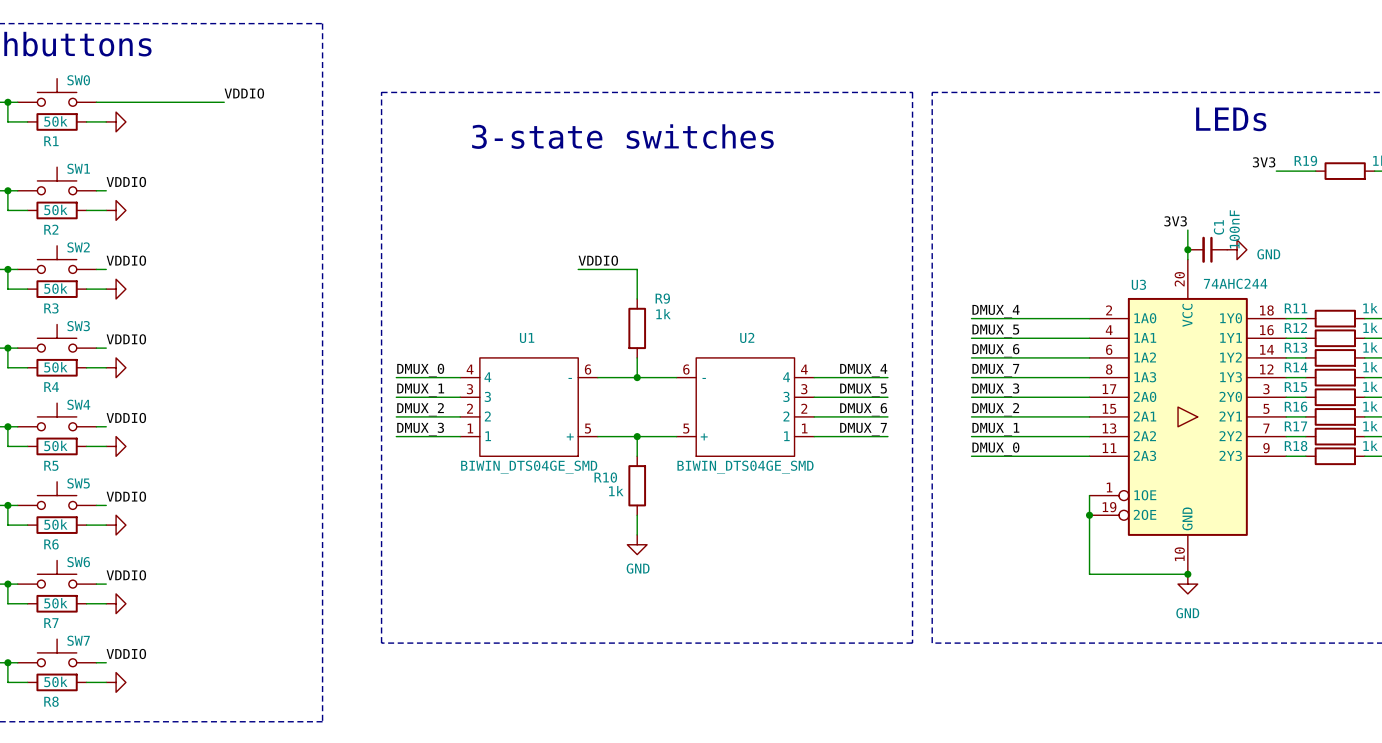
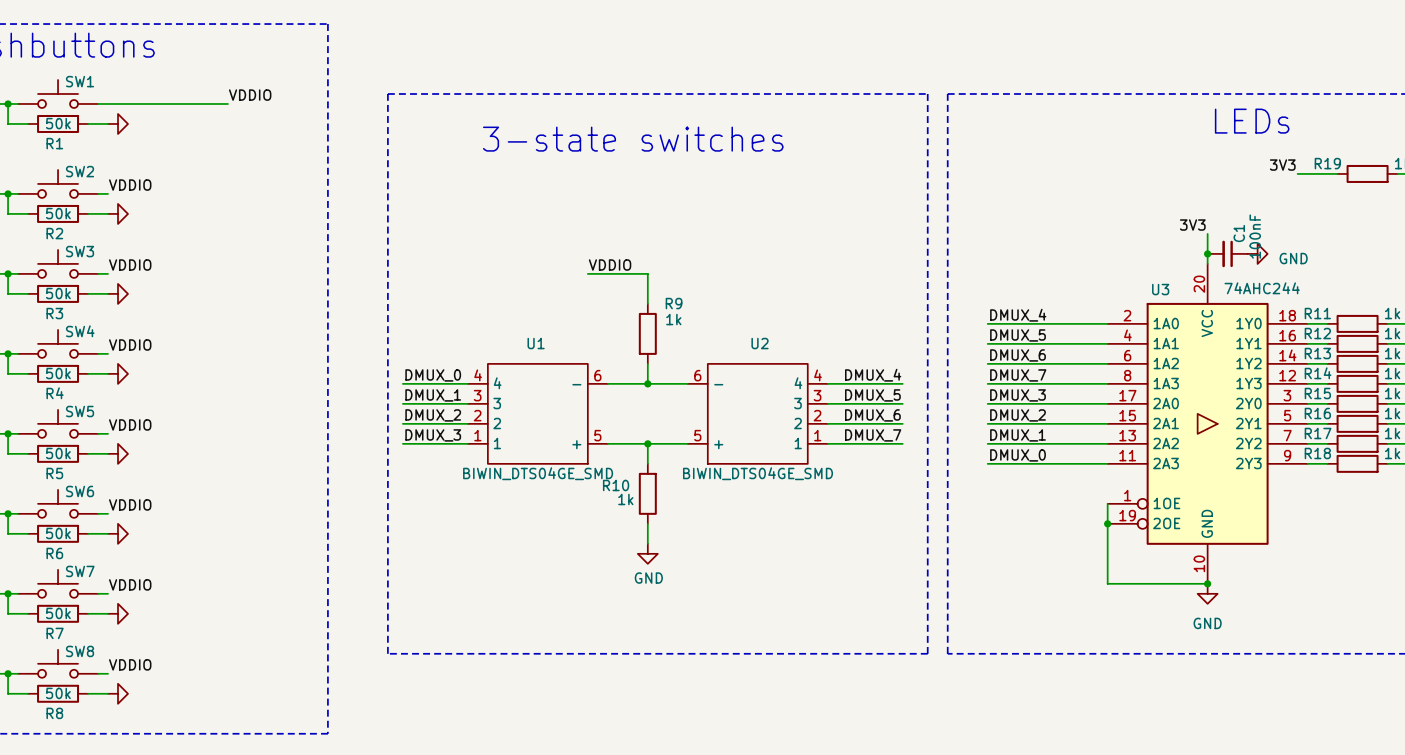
SW0 name: SW0 (78, 80) -> SW1 (80, 81)
SW1 name: SW1 (78, 168) -> SW2 (80, 171)
SW2 name: SW2 (78, 247) -> SW3 (80, 251)
SW3 name: SW3 (78, 326) -> SW4 (80, 331)
SW4 name: SW4 (78, 404) -> SW5 (80, 411)
SW5 name: SW5 (78, 483) -> SW6 (80, 491)
SW6 name: SW6 (78, 562) -> SW7 (80, 571)
SW7 name: SW7 (78, 640) -> SW8 (80, 651)

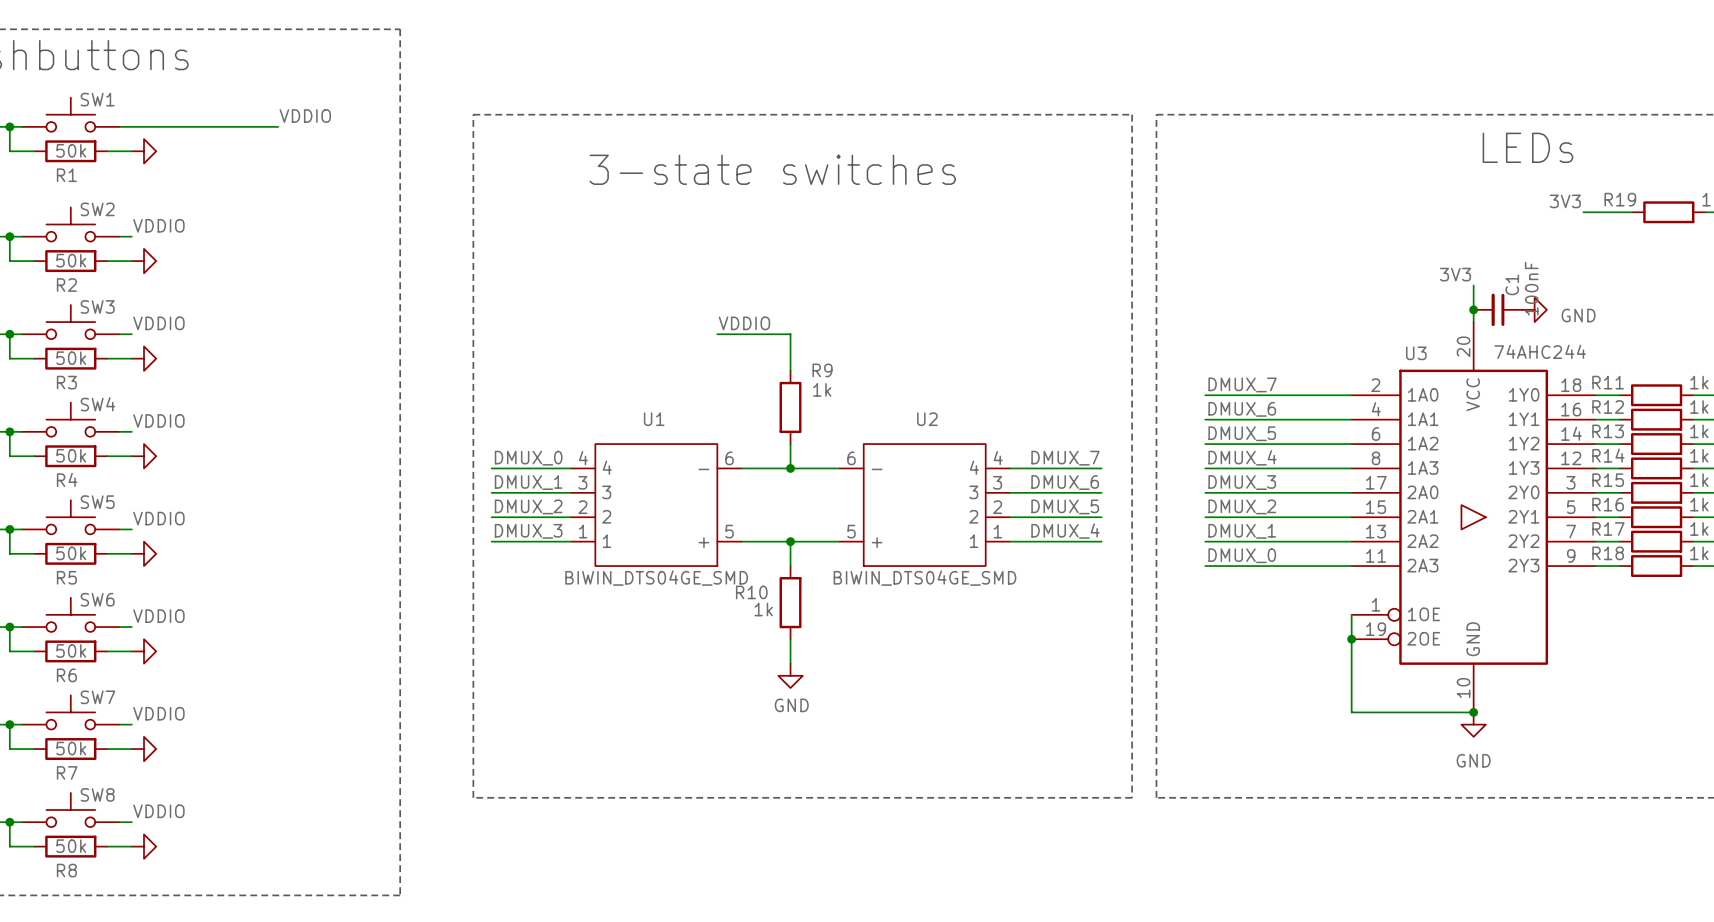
label: DMUX_4 (1018, 315) -> DMUX_7 (1242, 384)
label: DMUX_5 (1018, 335) -> DMUX_6 (1242, 409)
label: DMUX_6 (1018, 355) -> DMUX_5 (1242, 433)
label: DMUX_4 (873, 375) -> DMUX_7 (1065, 458)
label: DMUX_7 (1018, 375) -> DMUX_4 (1242, 457)
label: DMUX_5 (872, 395) -> DMUX_6 (1065, 482)
label: DMUX_6 (872, 415) -> DMUX_5 (1065, 506)
label: DMUX_7 (873, 435) -> DMUX_4 (1065, 531)

